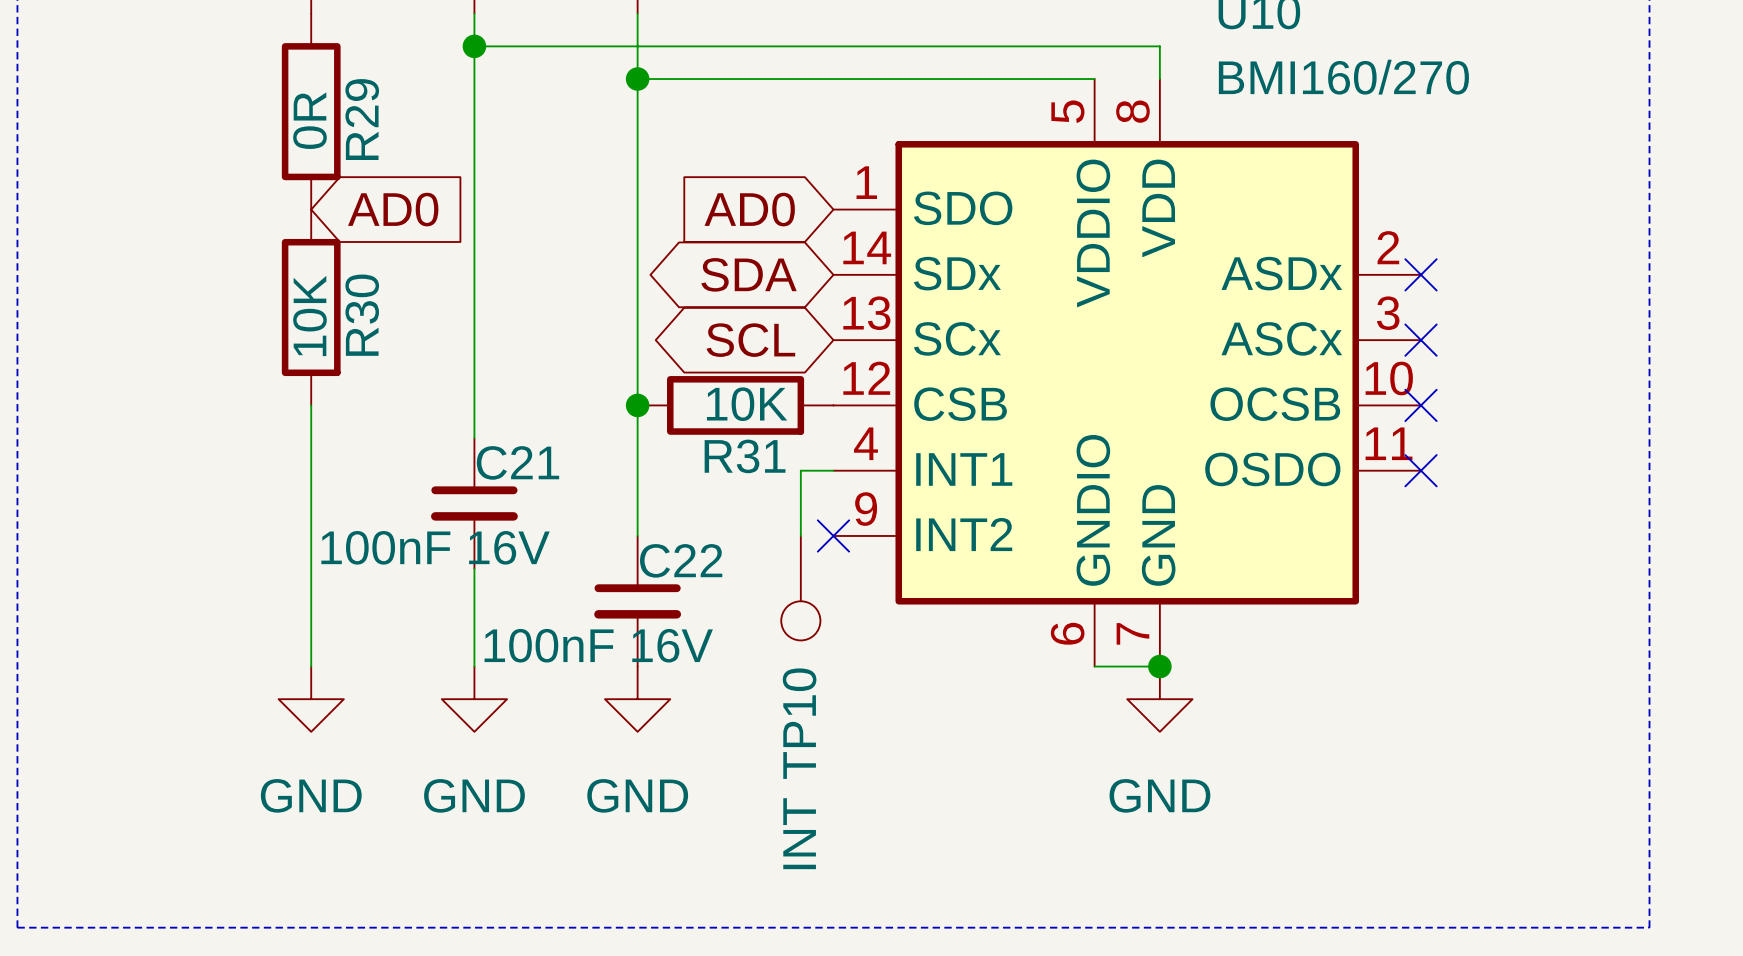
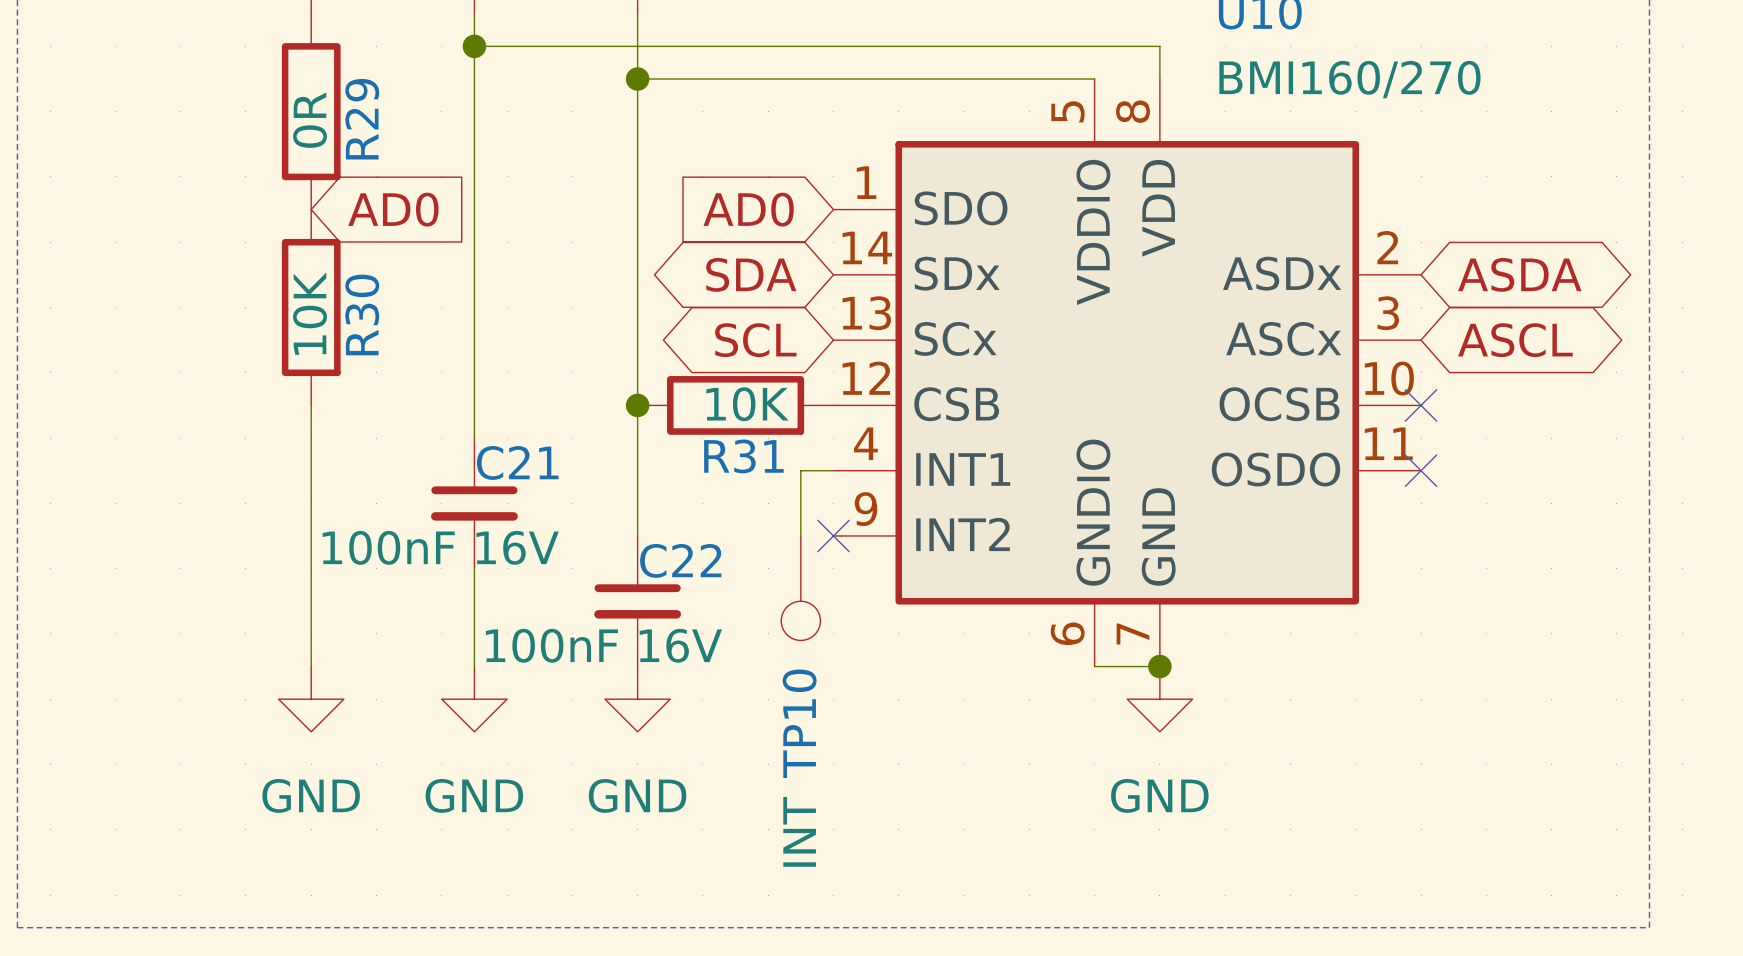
no-connect mark: (1421, 274) -> none
global label: none -> ASDA (1519, 274)
no-connect mark: (1421, 340) -> none
global label: none -> ASCL (1515, 340)

